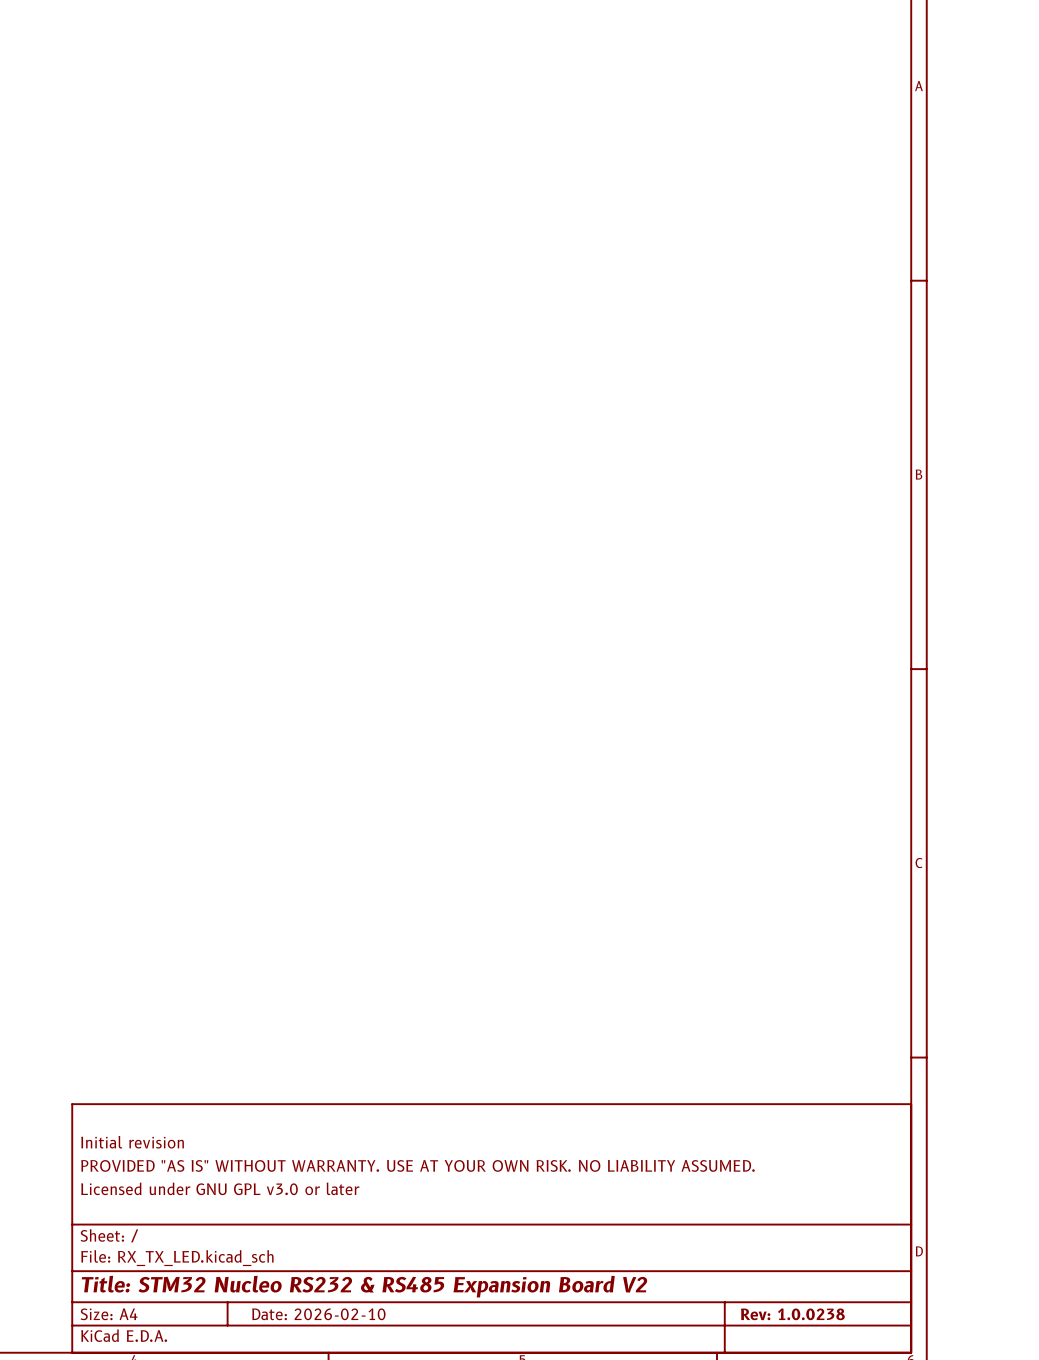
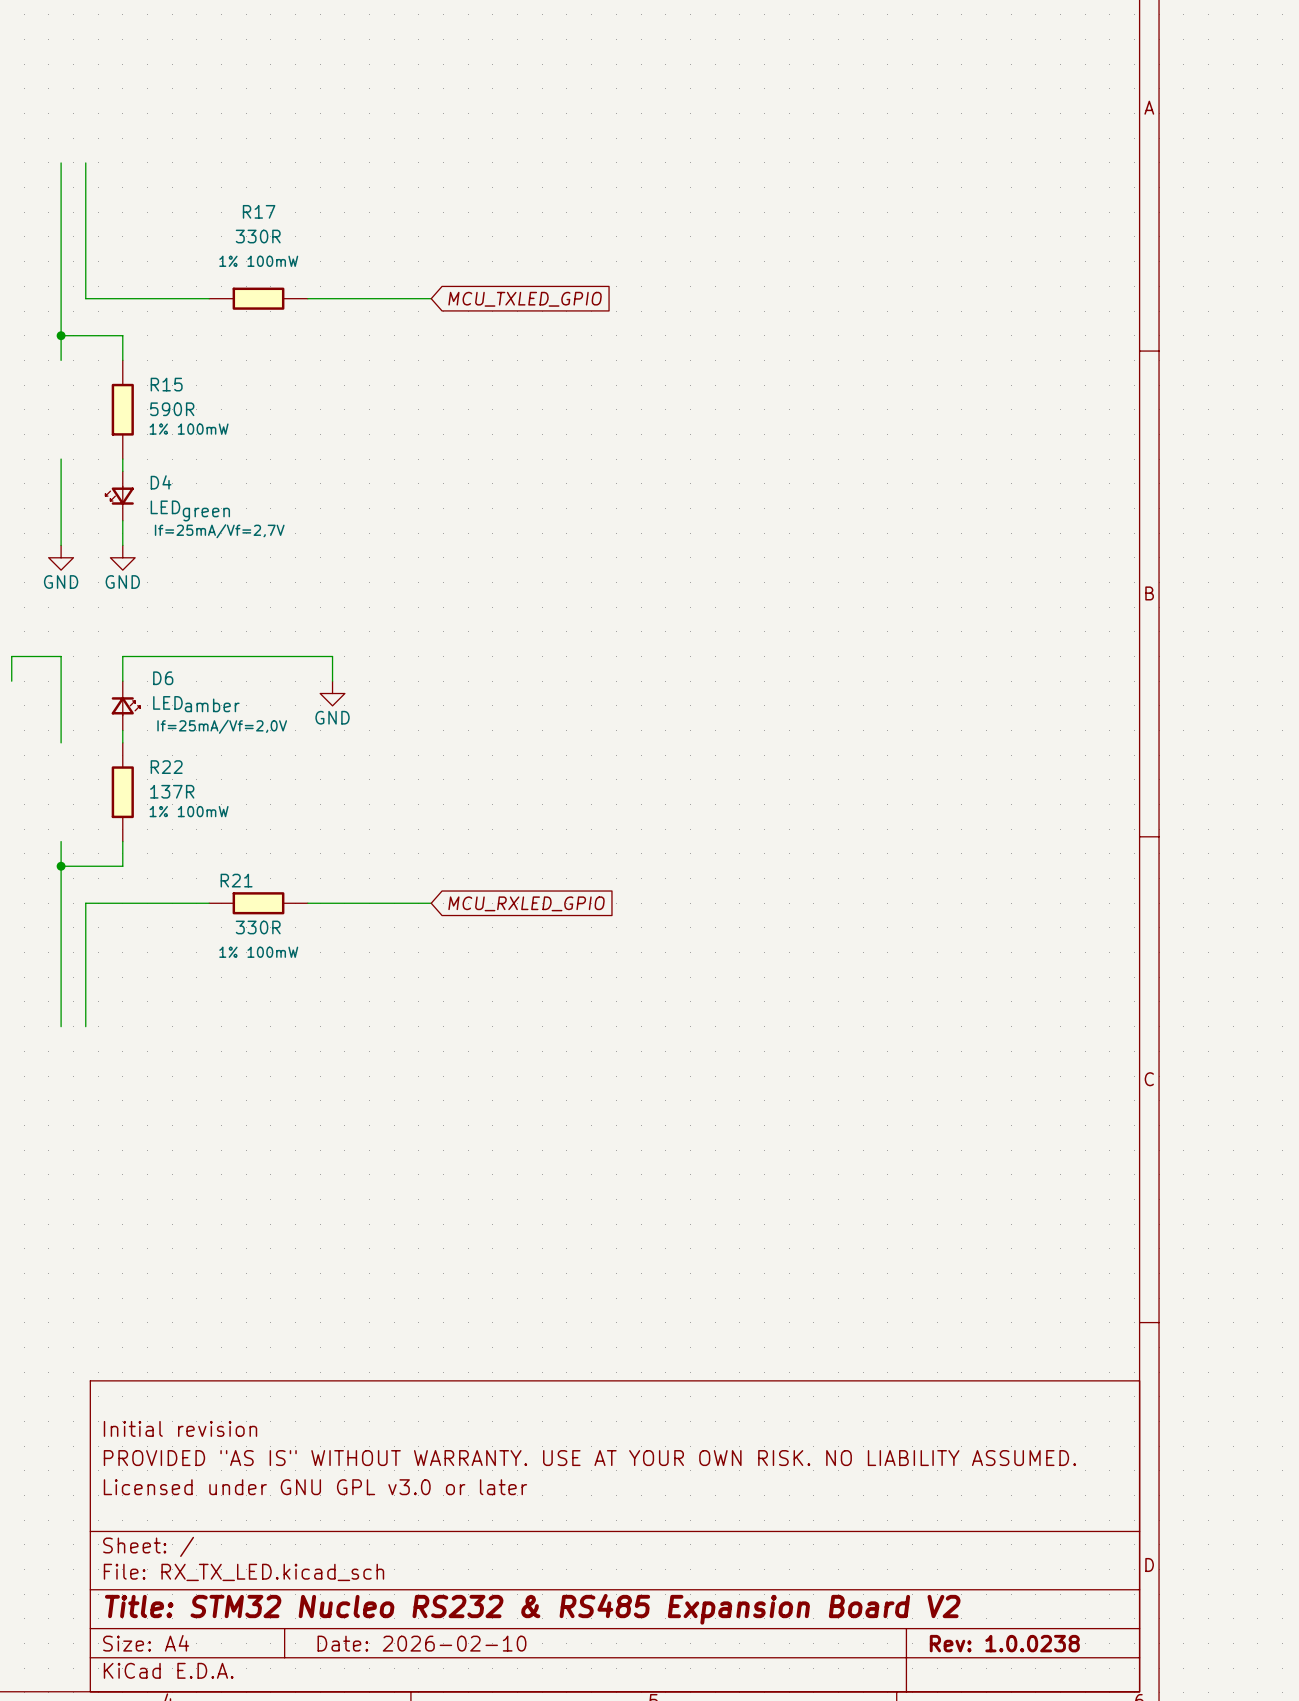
wire: none -> (61, 162) (61, 360)
wire: none -> (85, 162) (85, 298) (209, 298)
R17: none -> 330R (258, 298)
wire: none -> (307, 298) (431, 298)
global label: none -> MCU_TXLED_GPIO (525, 299)
wire: none -> (61, 335) (122, 335) (122, 360)
junction: none -> (61, 335)
R15: none -> 590R (122, 409)
wire: none -> (61, 459) (61, 545)
wire: none -> (122, 459) (122, 471)
D4: none -> LED (119, 496)
wire: none -> (122, 520) (122, 545)
power symbol: none -> GND (61, 557)
power symbol: none -> GND (122, 557)
wire: none -> (11, 681) (11, 656) (61, 656) (61, 742)
wire: none -> (122, 681) (122, 656) (332, 656) (332, 681)
power symbol: none -> GND (332, 693)
D6: none -> LED (125, 705)
wire: none -> (122, 730) (122, 742)
R22: none -> 137R (122, 792)
wire: none -> (61, 841) (61, 1026)
wire: none -> (122, 841) (122, 866) (61, 866)
junction: none -> (61, 866)
wire: none -> (209, 903) (85, 903) (85, 1026)
R21: none -> 330R (258, 903)
wire: none -> (307, 903) (431, 903)
global label: none -> MCU_RXLED_GPIO (526, 903)

